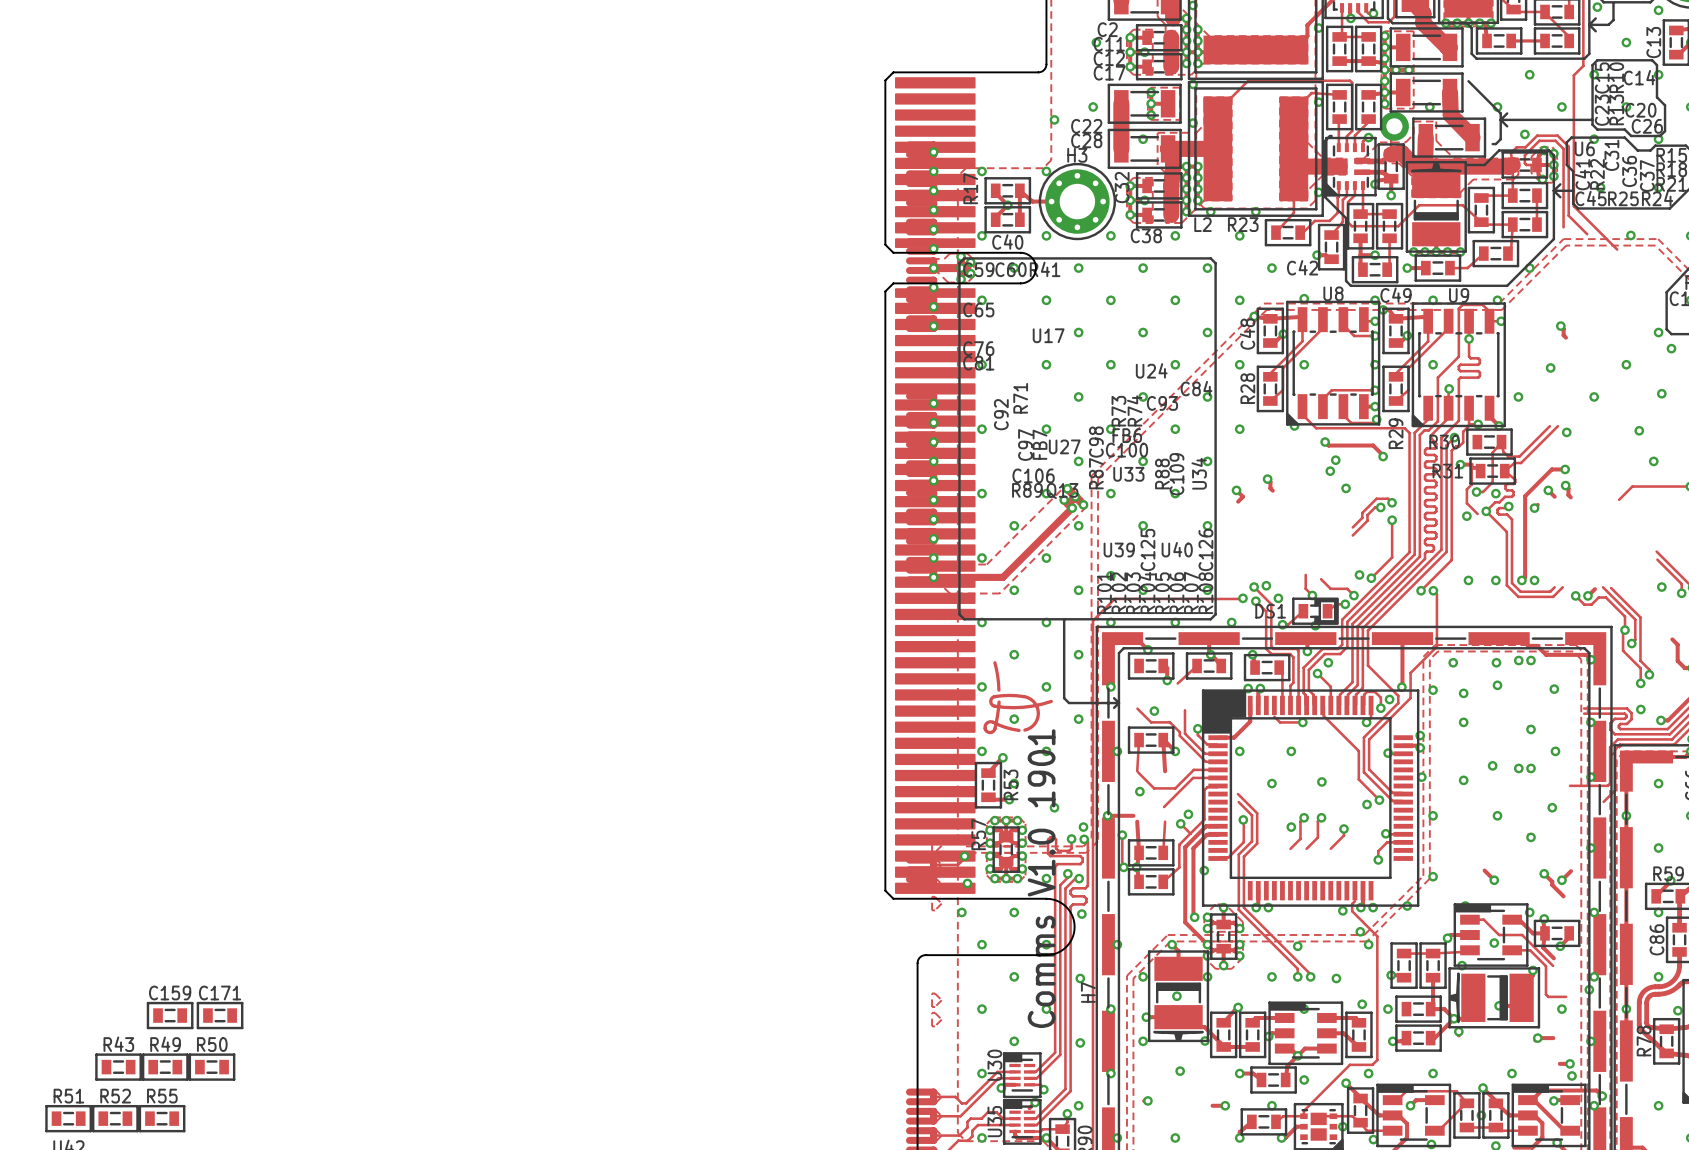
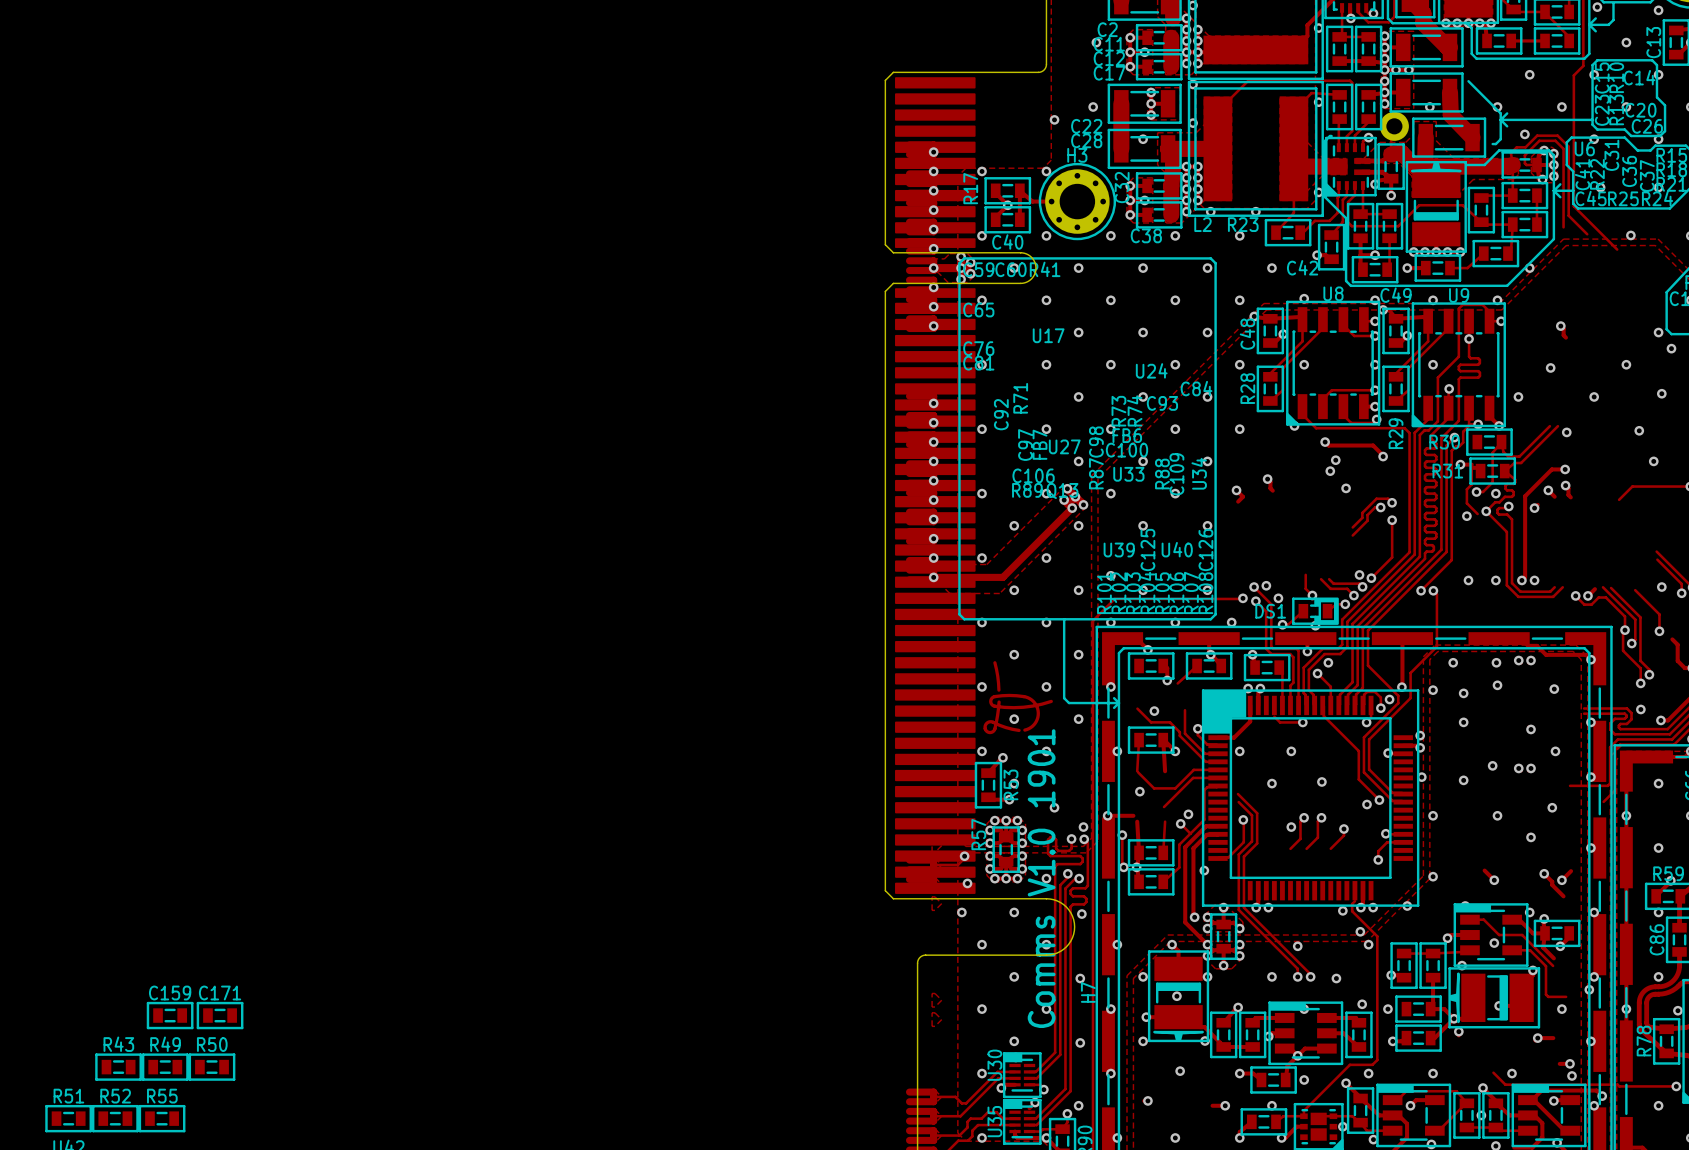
track: none -> (1329, 579) (1333, 583) (1359, 583) (1362, 586)
via: none -> (1362, 586)
track: none -> (1635, 590) (1659, 614) (1659, 631)
via: none -> (1659, 631)
track: none -> (1493, 1072) (1505, 1084) (1676, 1086)
via: none -> (1676, 1086)

